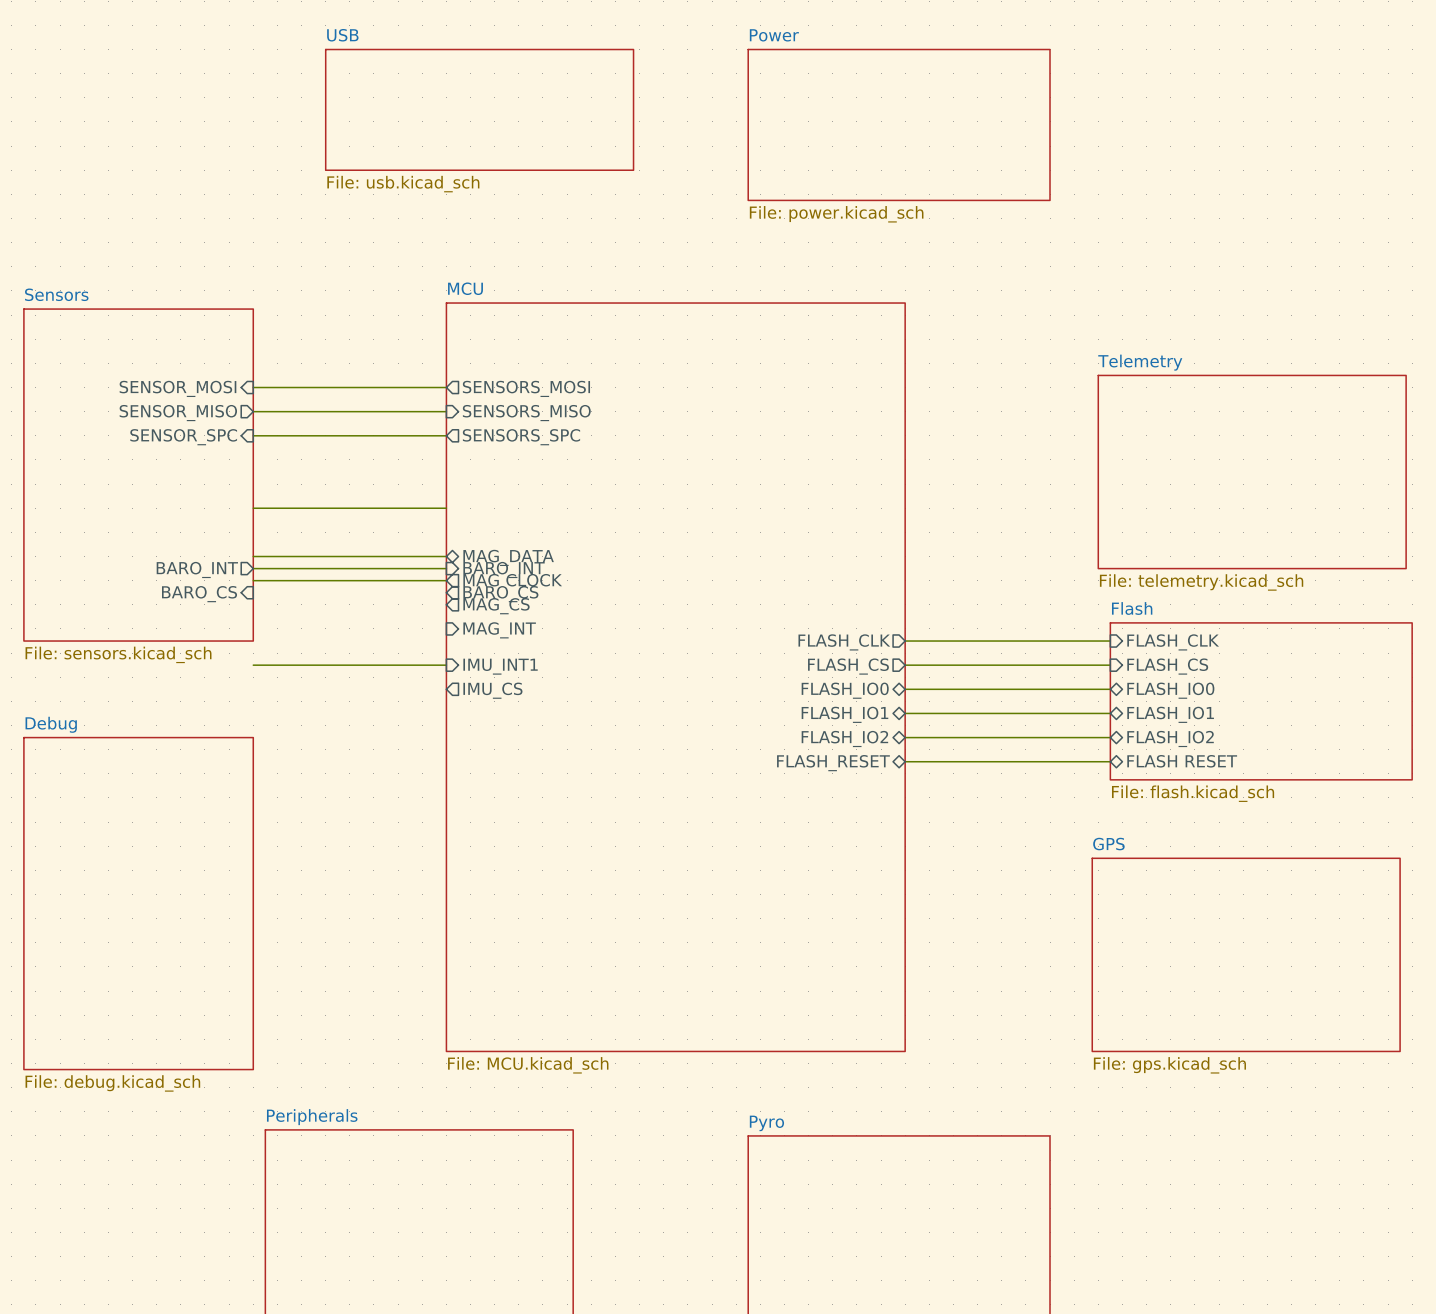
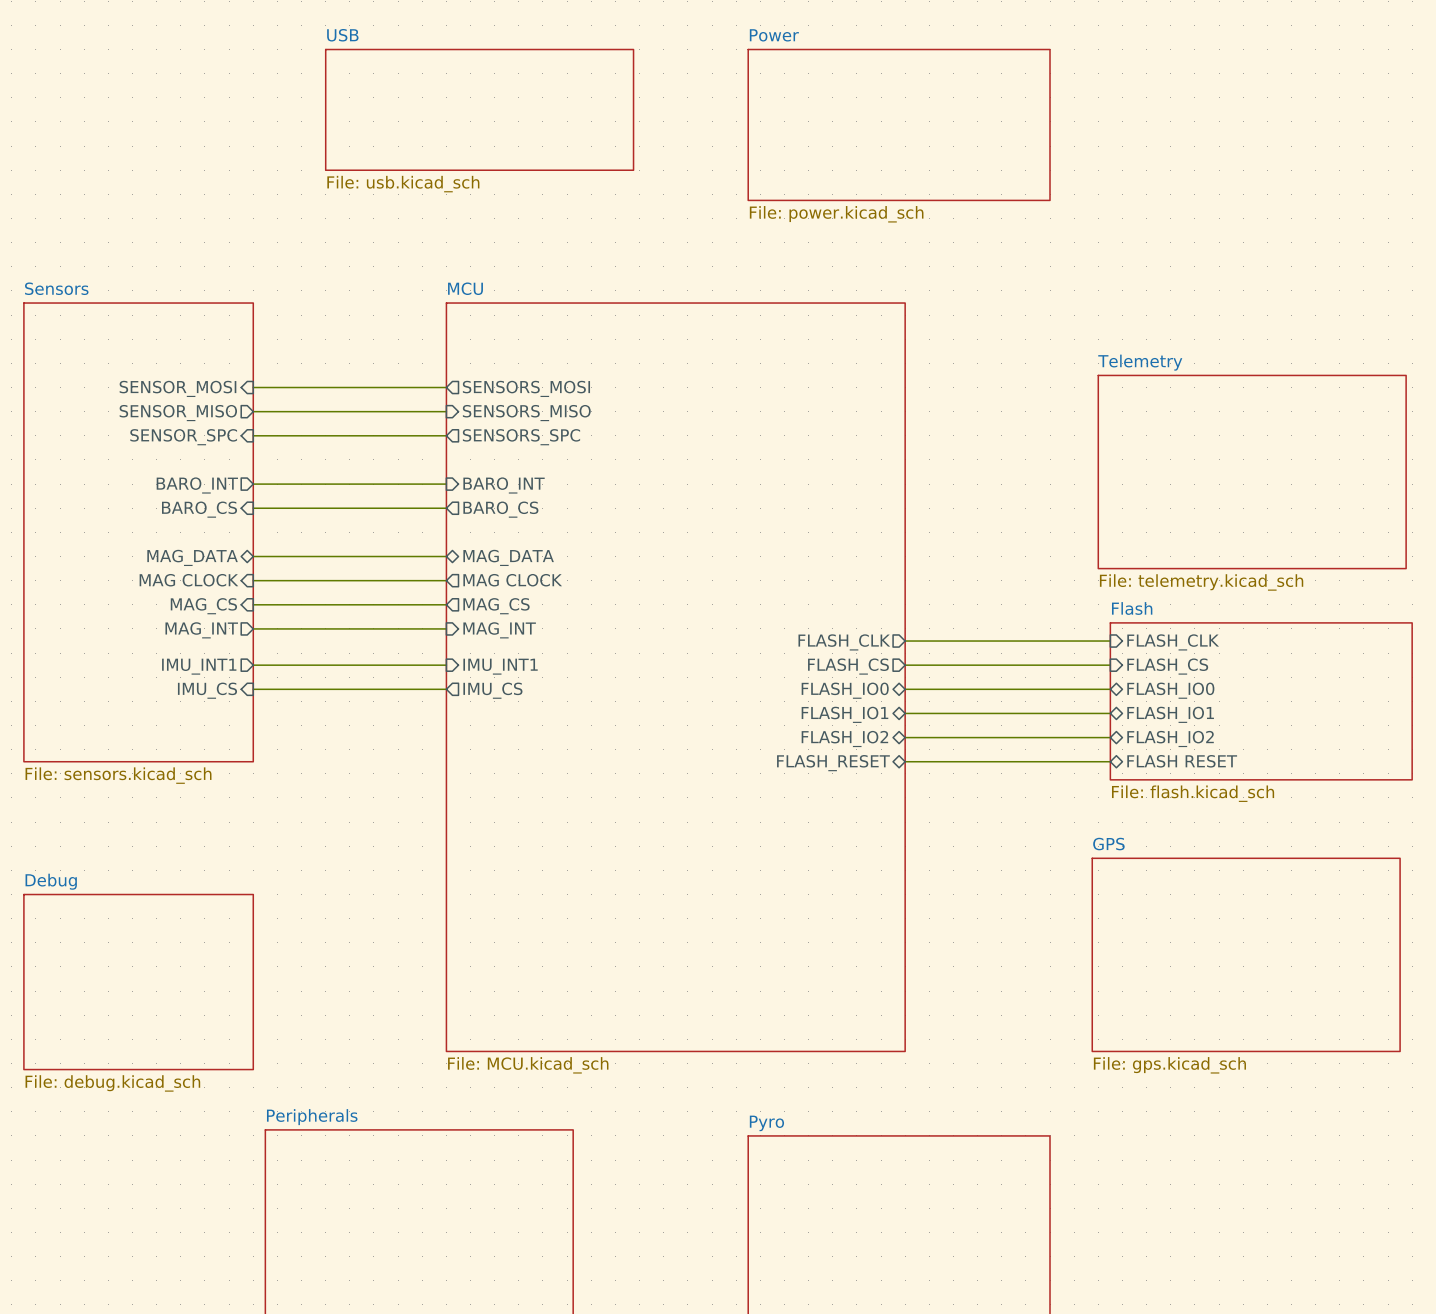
sheet Sensors: File: sensors.kicad_sch (138, 475) -> none
wire: none -> (253, 484) (446, 484)
sheet Sensors: none -> File: sensors.kicad_sch (138, 532)
sheet pin: none -> MAG_DATA (192, 557)
wire: (253, 568) (446, 568) -> (253, 604) (446, 604)
sheet pin position: BARO_INT (197, 569) -> BARO_INT (197, 485)
sheet pin position: BARO_INT (504, 569) -> BARO_INT (504, 485)
sheet pin: none -> MAG CLOCK (188, 580)
sheet pin position: BARO_CS (199, 594) -> BARO_CS (199, 509)
sheet pin position: BARO_CS (500, 594) -> BARO_CS (500, 509)
sheet pin: none -> MAG_CS (203, 606)
wire: none -> (253, 628) (446, 628)
sheet pin: none -> MAG_INT (201, 630)
sheet pin: none -> IMU_INT1 (199, 666)
wire: none -> (253, 689) (446, 689)
sheet pin: none -> IMU_CS (207, 690)
sheet Debug: File: debug.kicad_sch (138, 903) -> none
sheet Debug: none -> File: debug.kicad_sch (138, 982)

